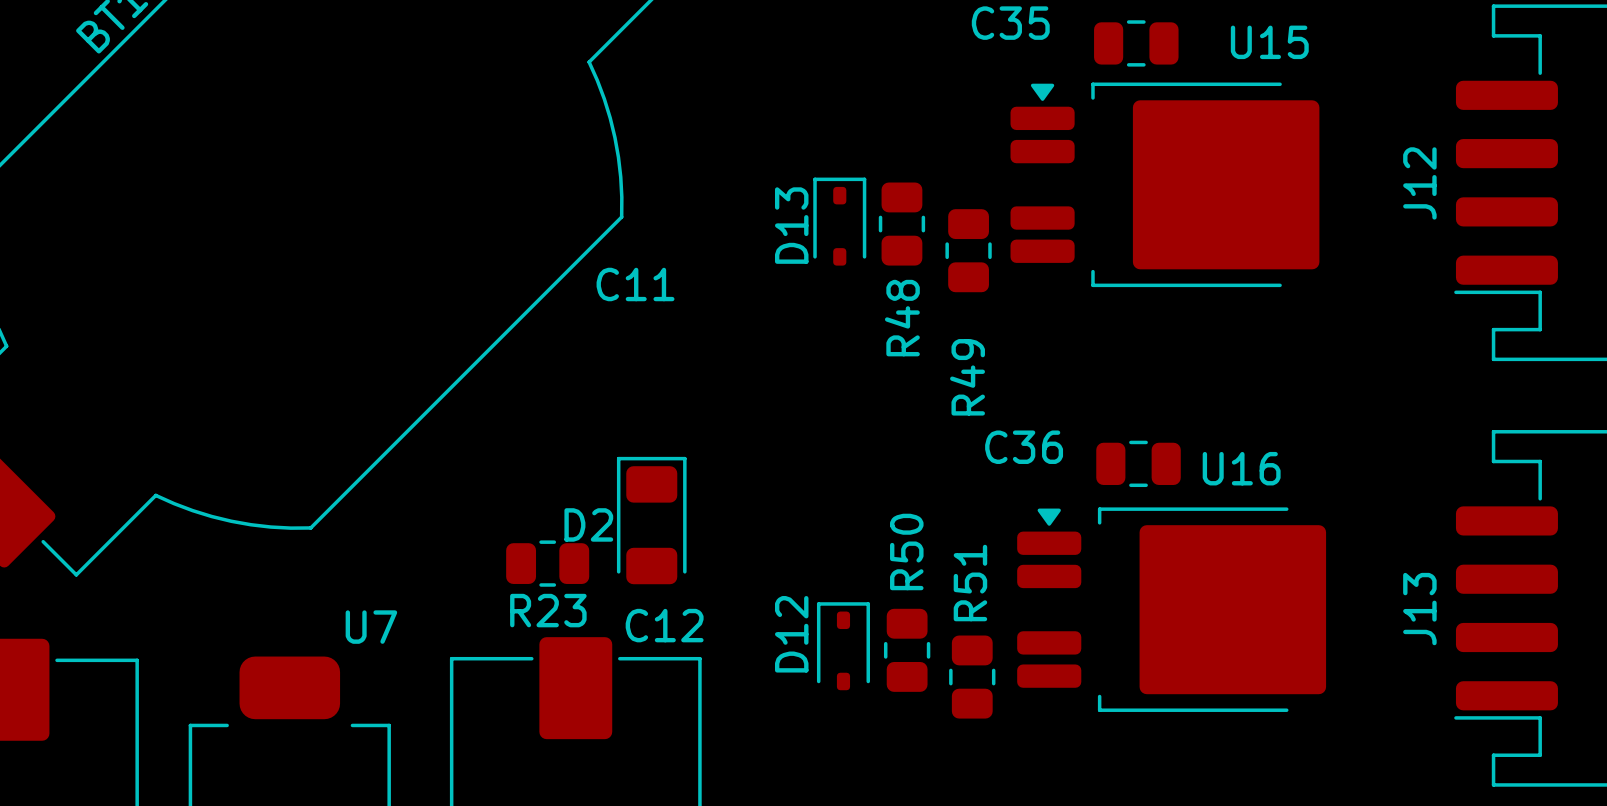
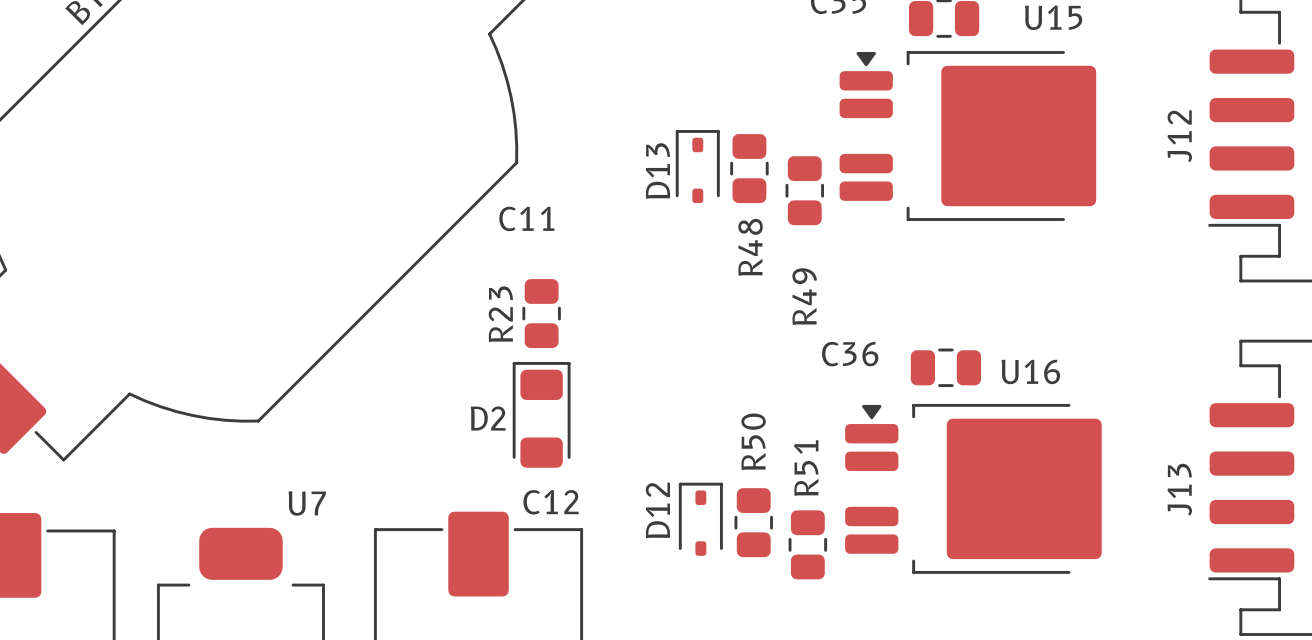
R23 rotation: 0° (547, 563) -> 90° clockwise (541, 313)
R23 position: (547, 563) -> (541, 313)

